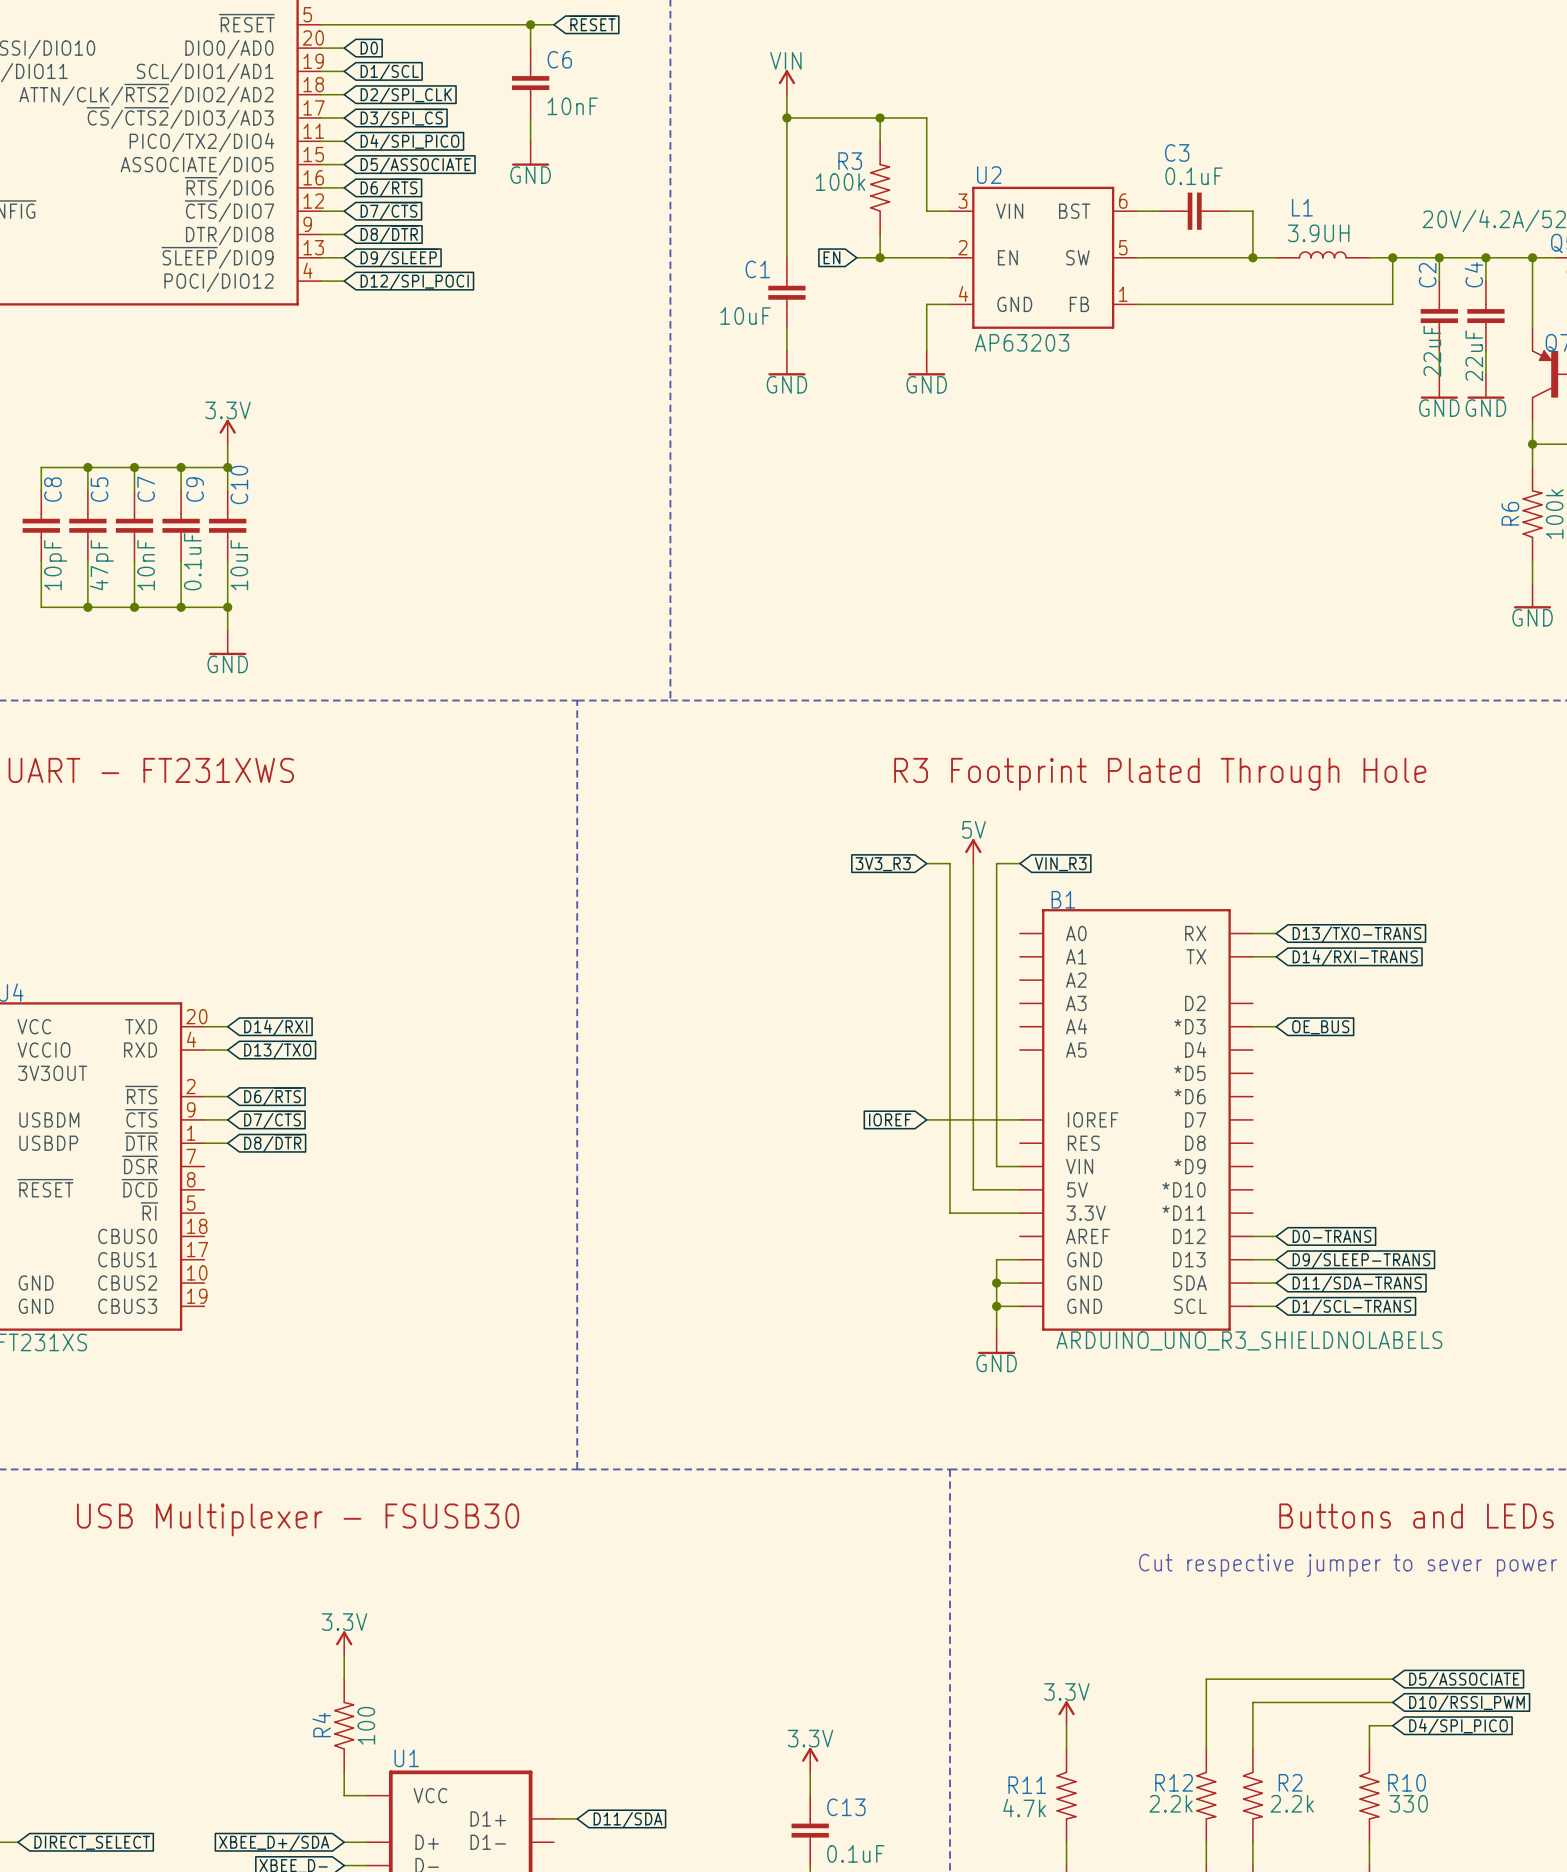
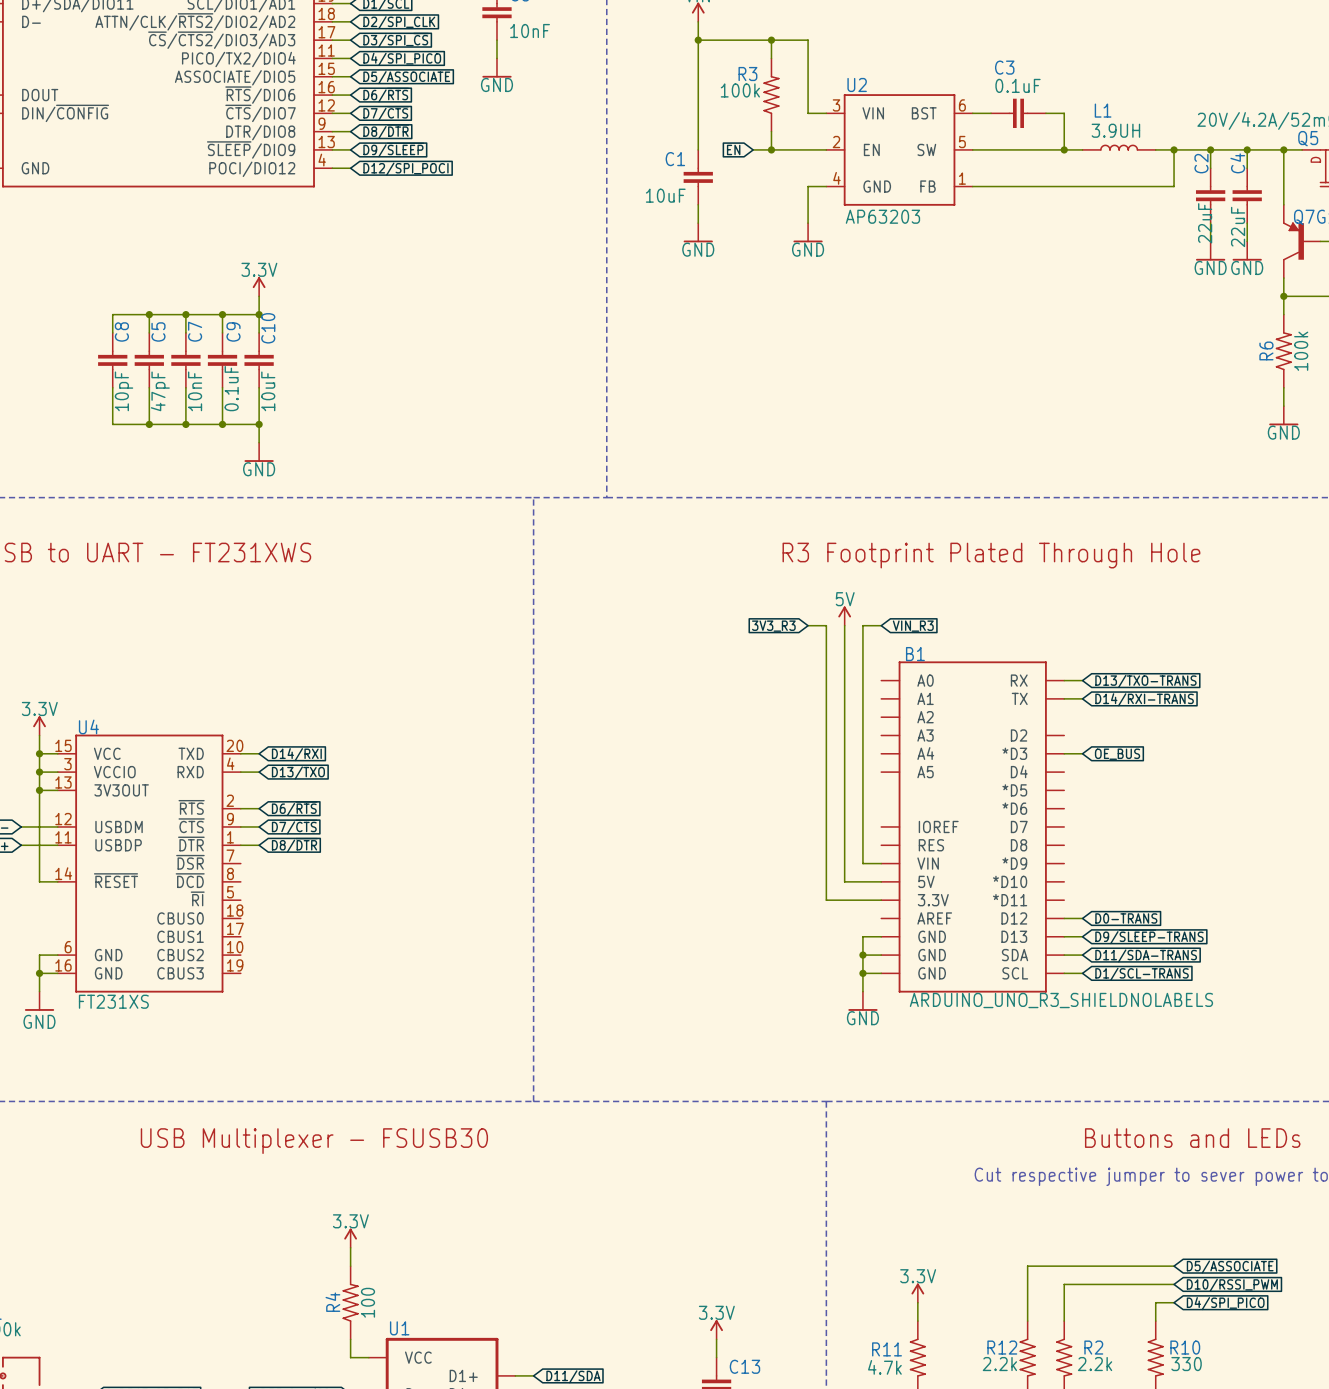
global label: IOREF (890, 1119) -> none
wire: (926, 1119) (1019, 1119) -> none

